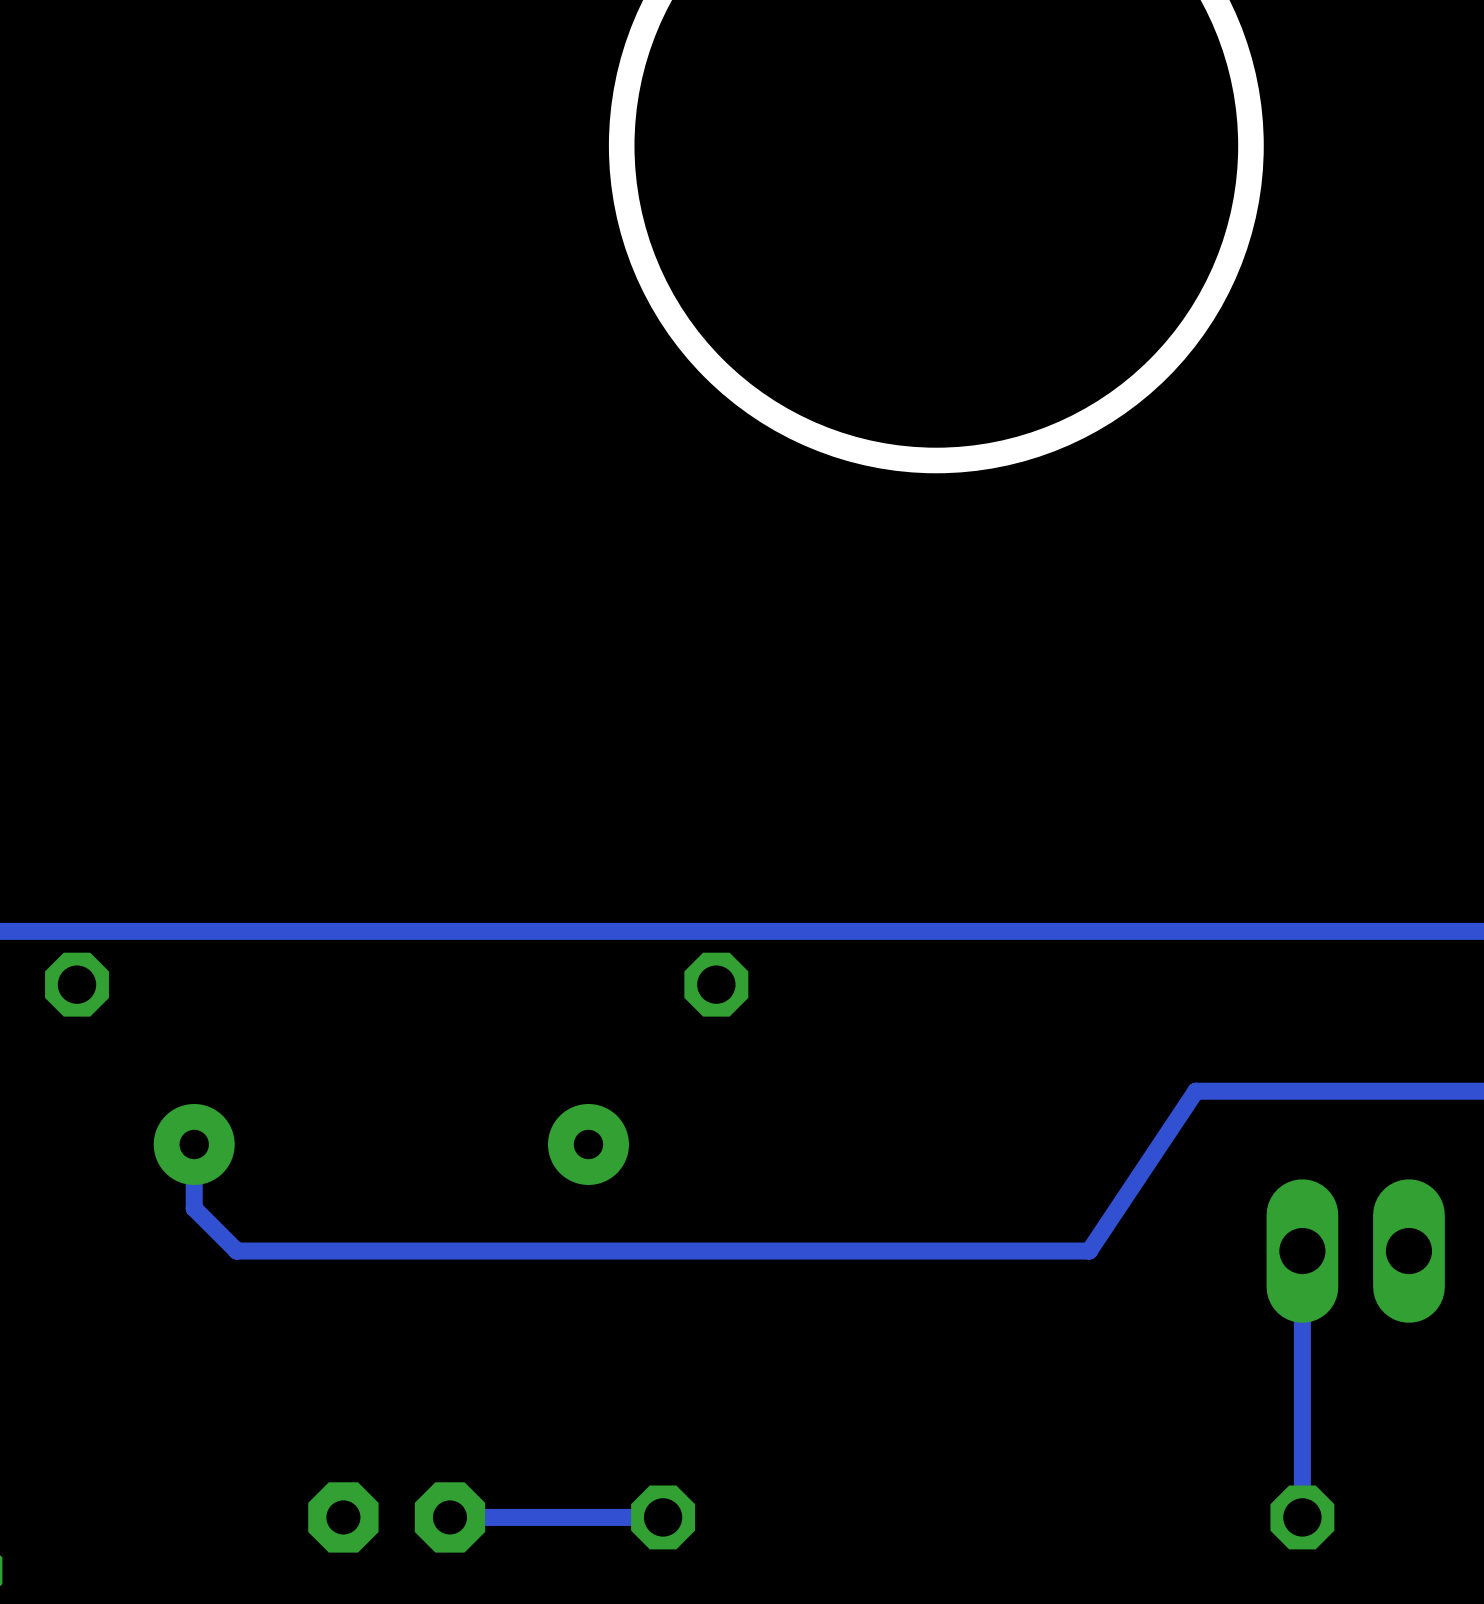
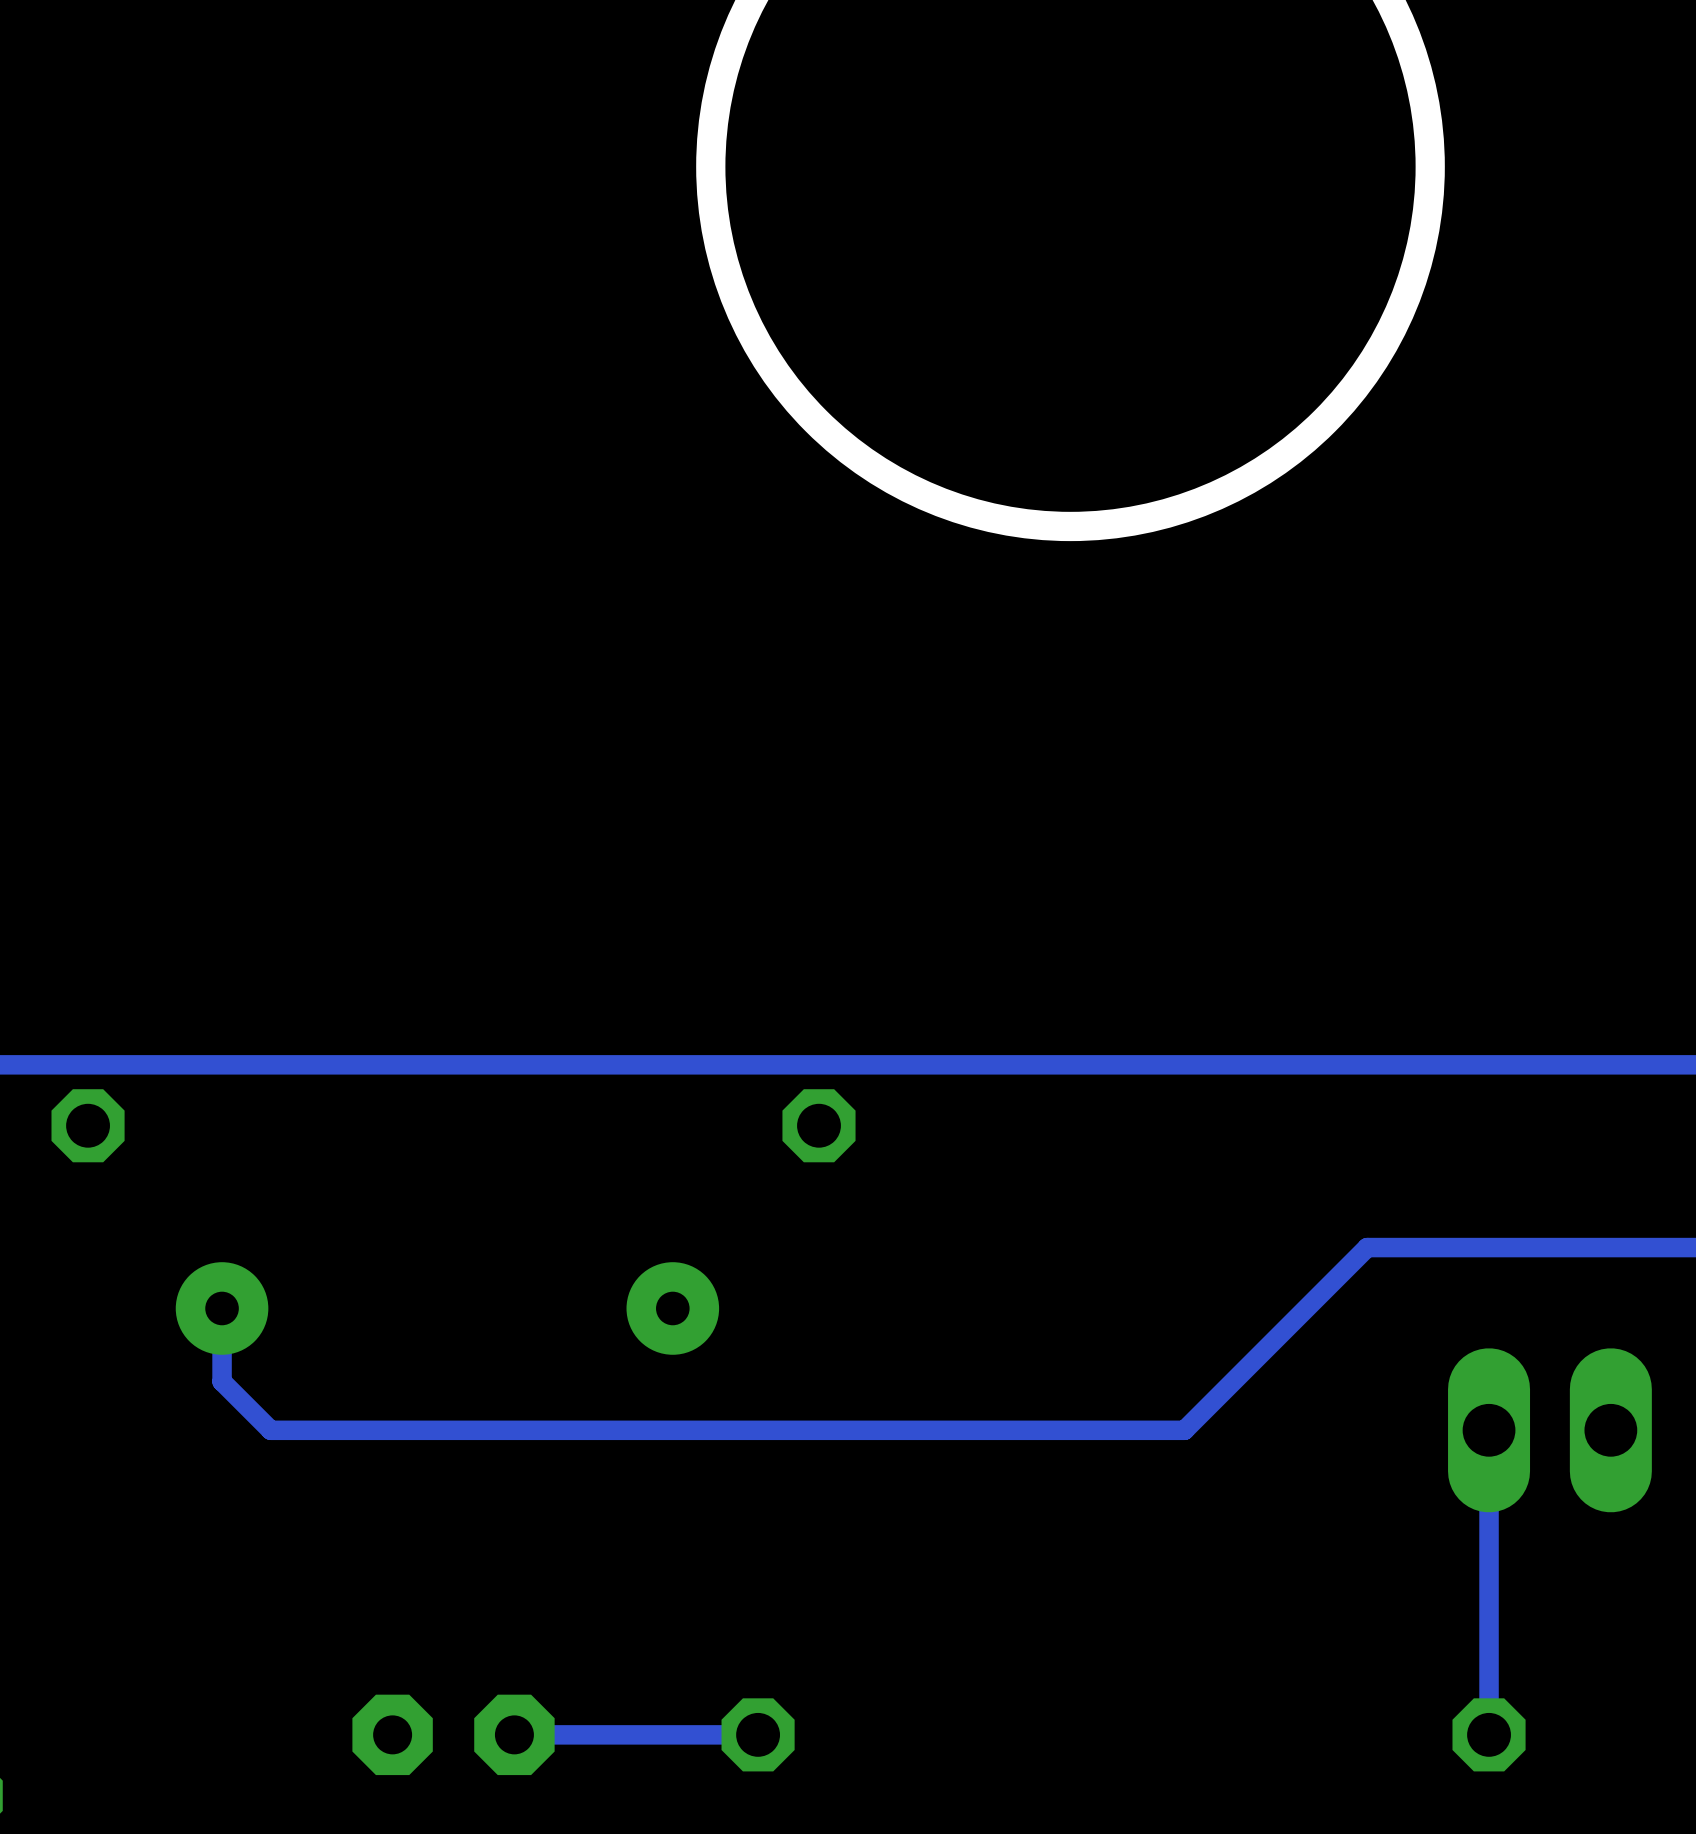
track: (1195, 1091) (1089, 1251) (1036, 1251) -> (1367, 1247) (1184, 1430)

